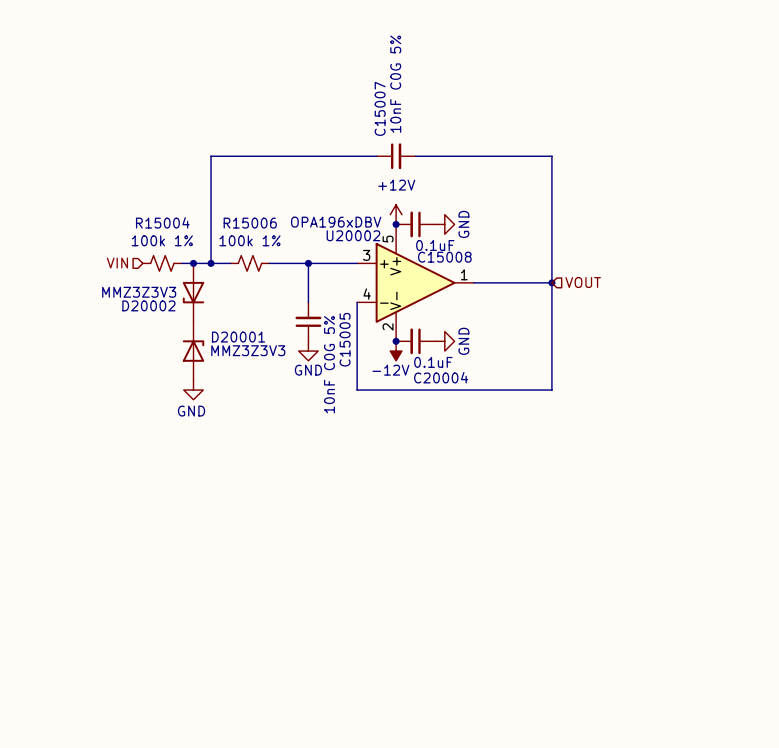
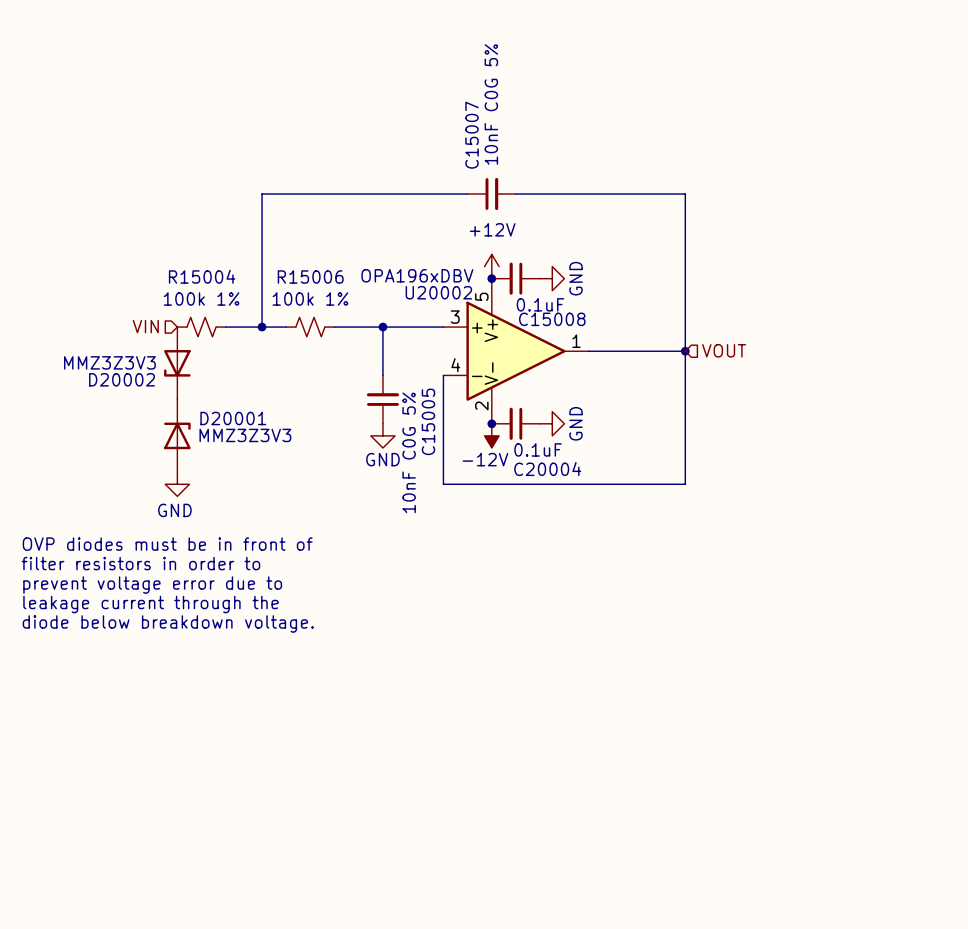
junction: (193, 263) -> none
D20002 position: (193, 292) -> (177, 363)
D20001 position: (193, 351) -> (177, 435)
power symbol position: GND (193, 390) -> GND (177, 484)
text: none -> OVP diodes must be in front of (167, 544)
text: none -> filter resistors in order to (140, 563)
text: none -> prevent voltage error due to (152, 585)
text: none -> leakage current through the (150, 604)
text: none -> diode below breakdown voltage. (168, 623)

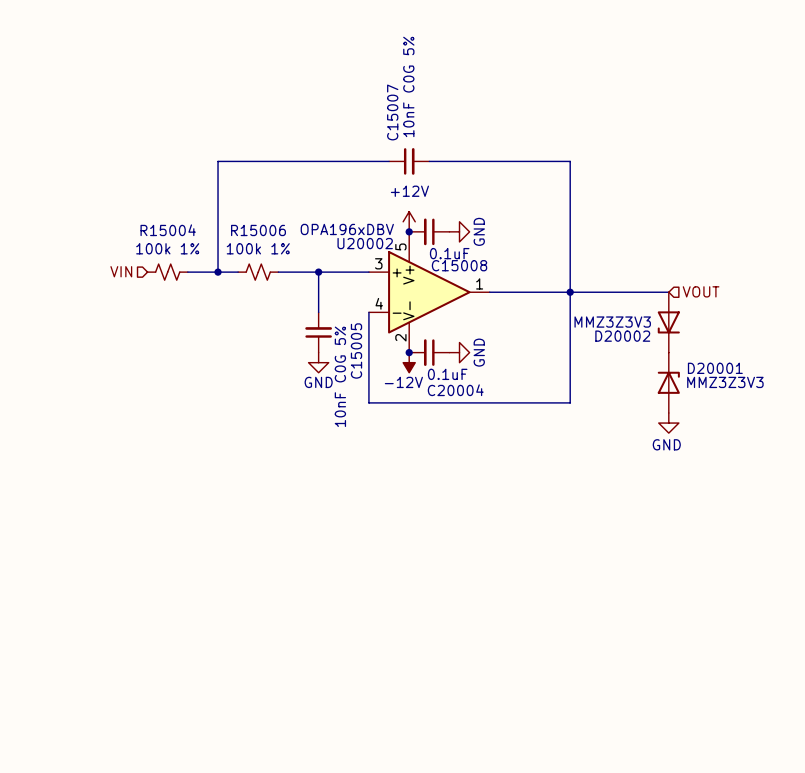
hierarchical label position: VOUT (724, 350) -> VOUT (701, 291)
wire: none -> (570, 292) (668, 292)
D20002 position: (177, 363) -> (668, 322)
D20001 position: (177, 435) -> (668, 382)
power symbol: GND (177, 484) -> none
power symbol: none -> GND (668, 423)
text: OVP diodes must be in front of (167, 544) -> none
text: filter resistors in order to (140, 563) -> none
text: prevent voltage error due to (152, 585) -> none
text: leakage current through the (150, 604) -> none
text: diode below breakdown voltage. (168, 623) -> none

